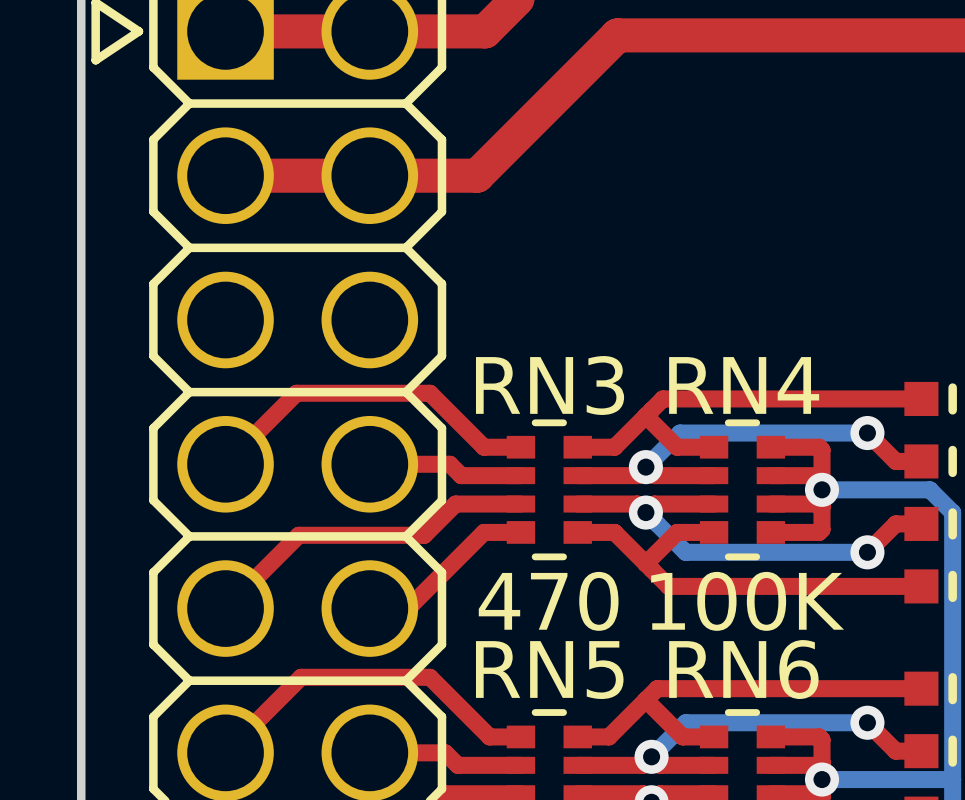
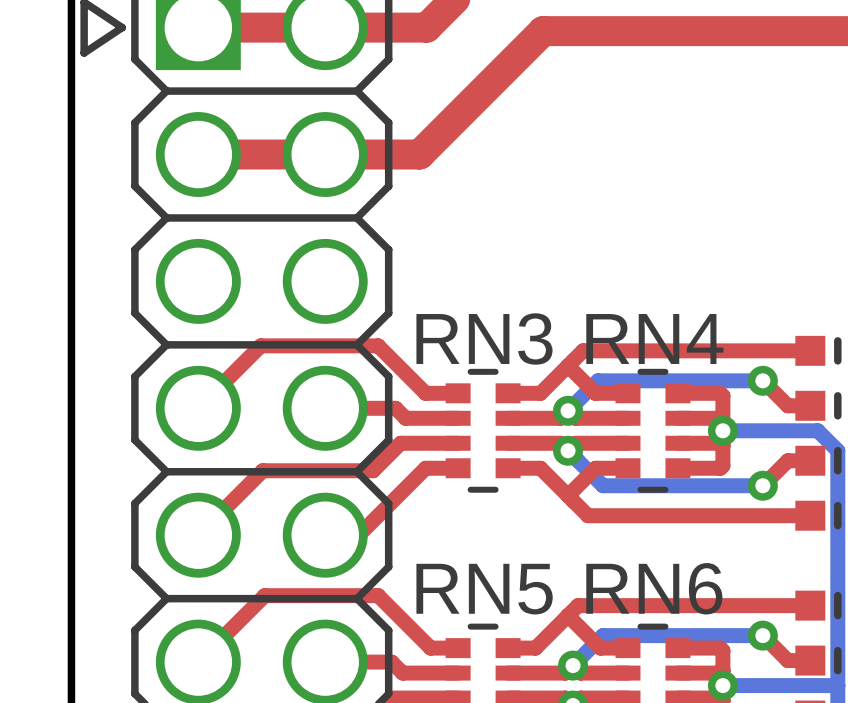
RN3 value: 470 (548, 601) -> none
RN4 value: 100K (747, 601) -> none

